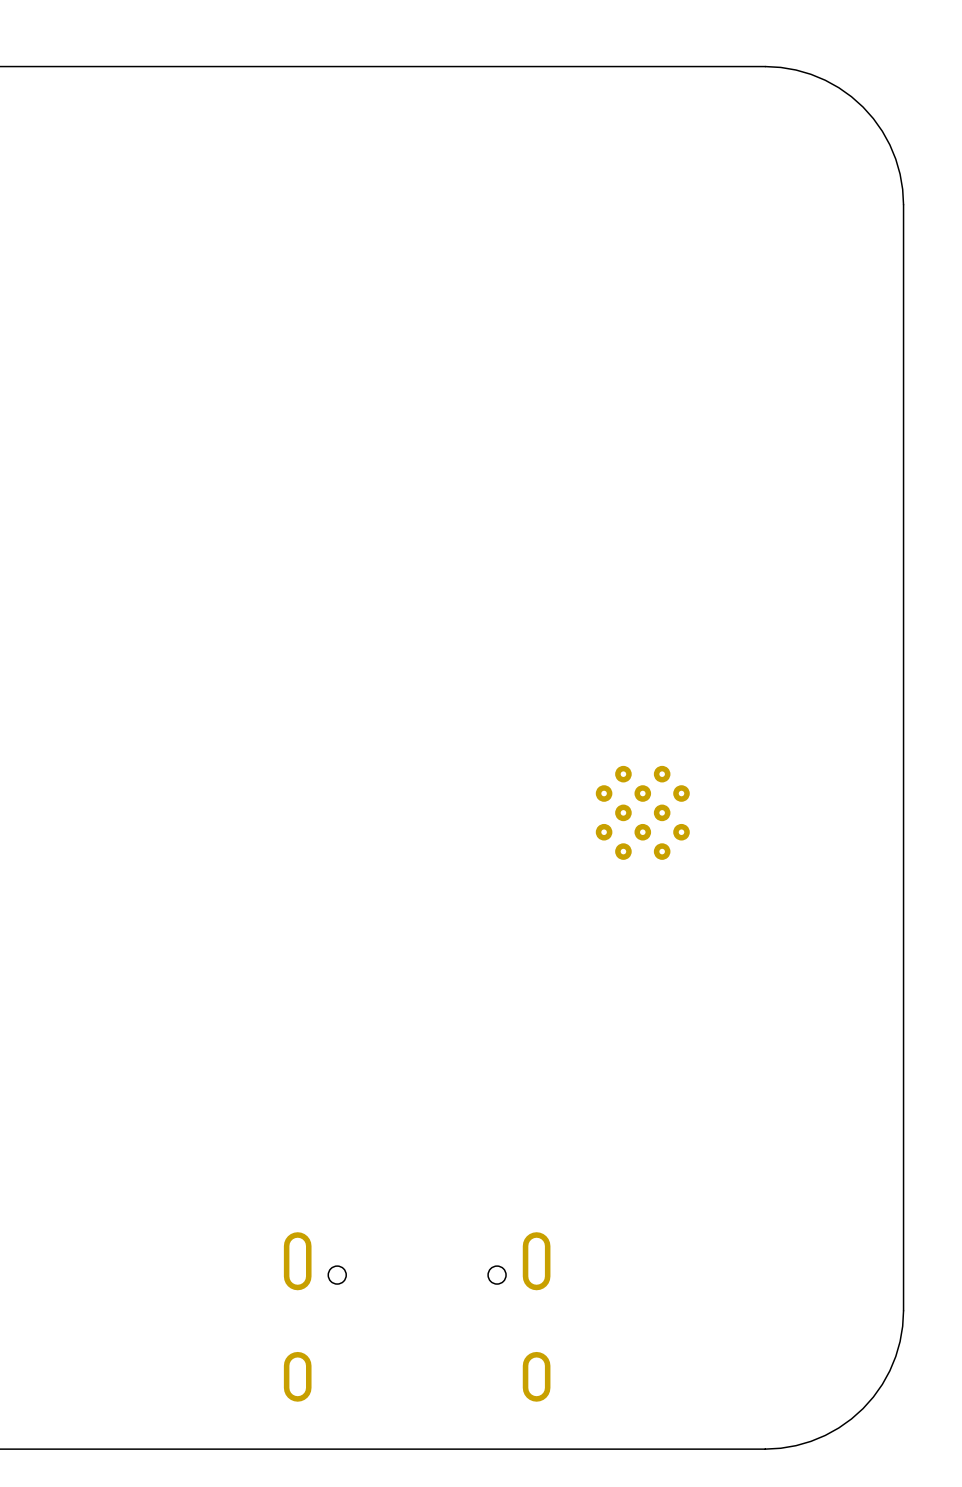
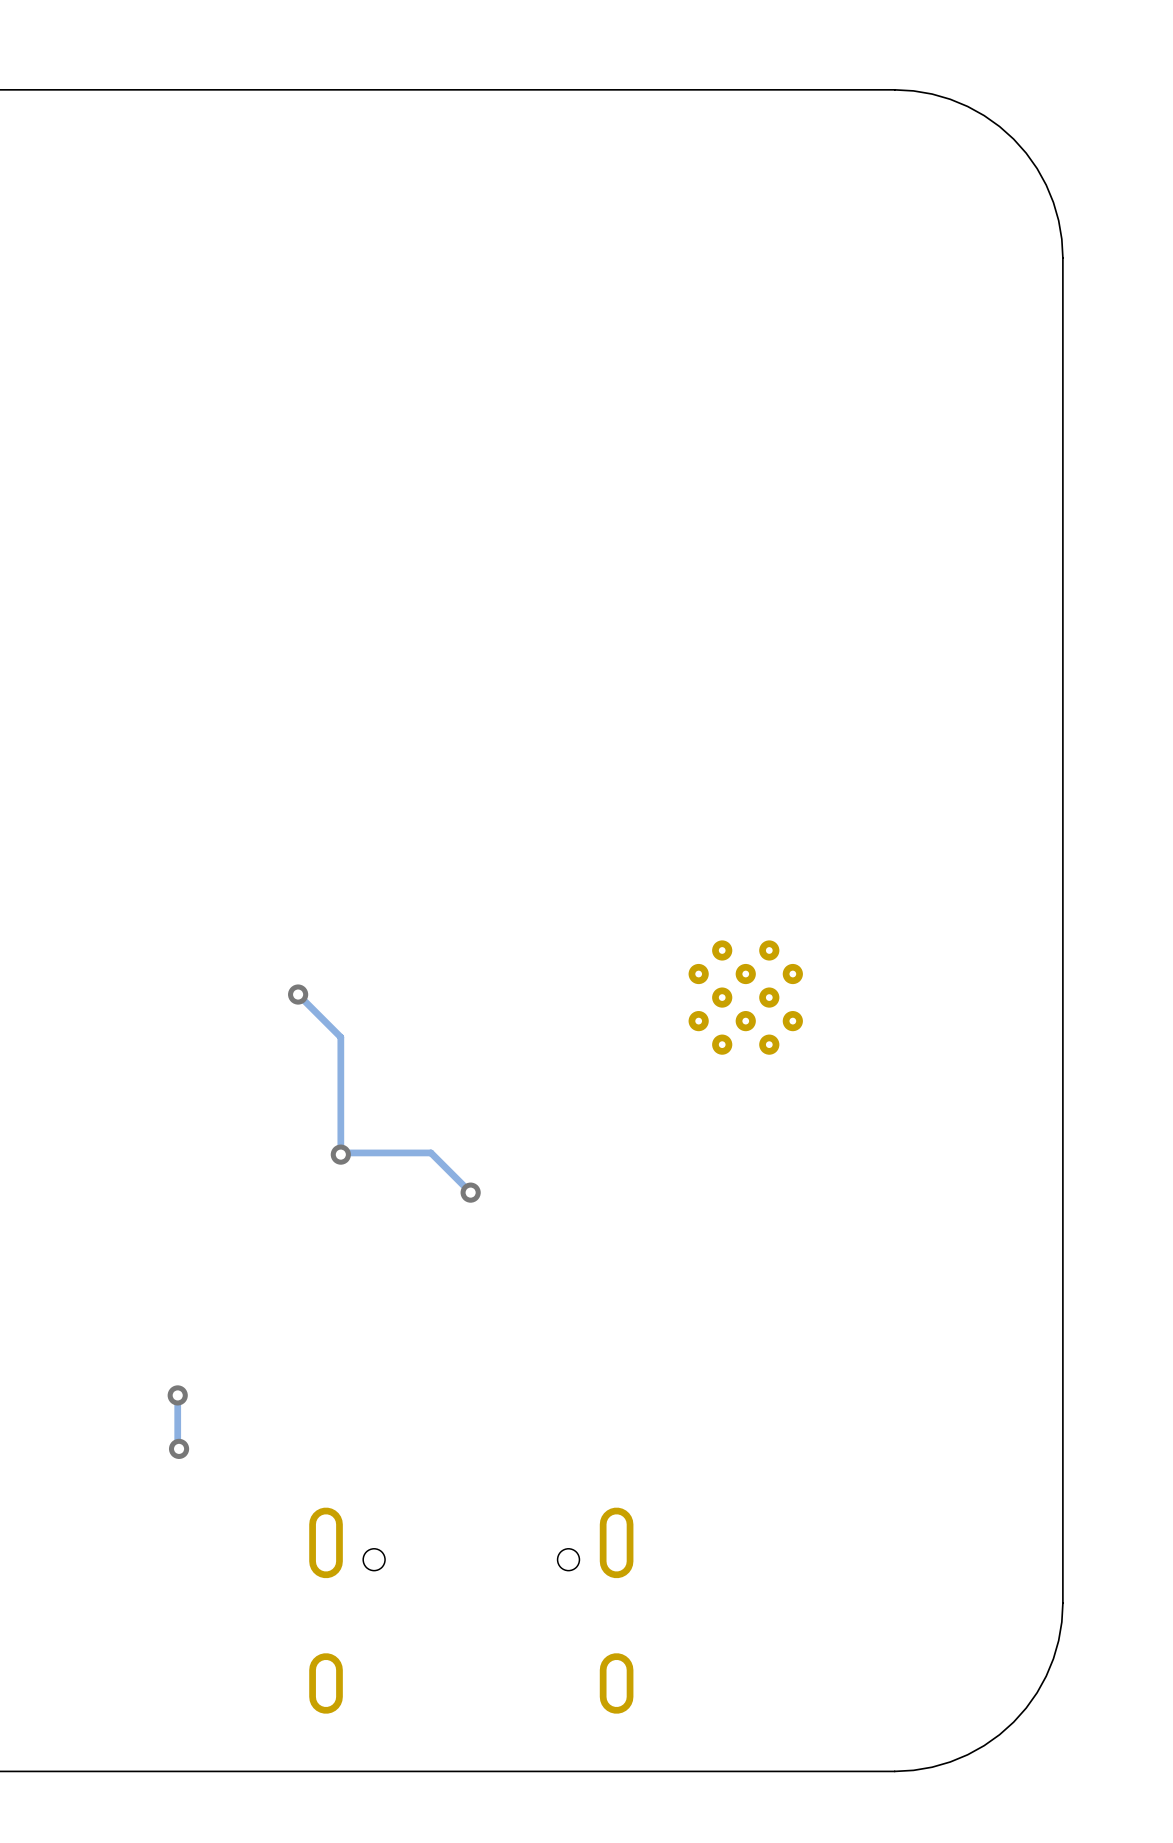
track: none -> (298, 994) (340, 1037) (340, 1154) (342, 1152) (430, 1152) (470, 1192)
via: none -> (298, 994)
via: none -> (340, 1154)
via: none -> (470, 1192)
track: none -> (177, 1395) (177, 1447) (180, 1449)
via: none -> (177, 1395)
via: none -> (179, 1448)

